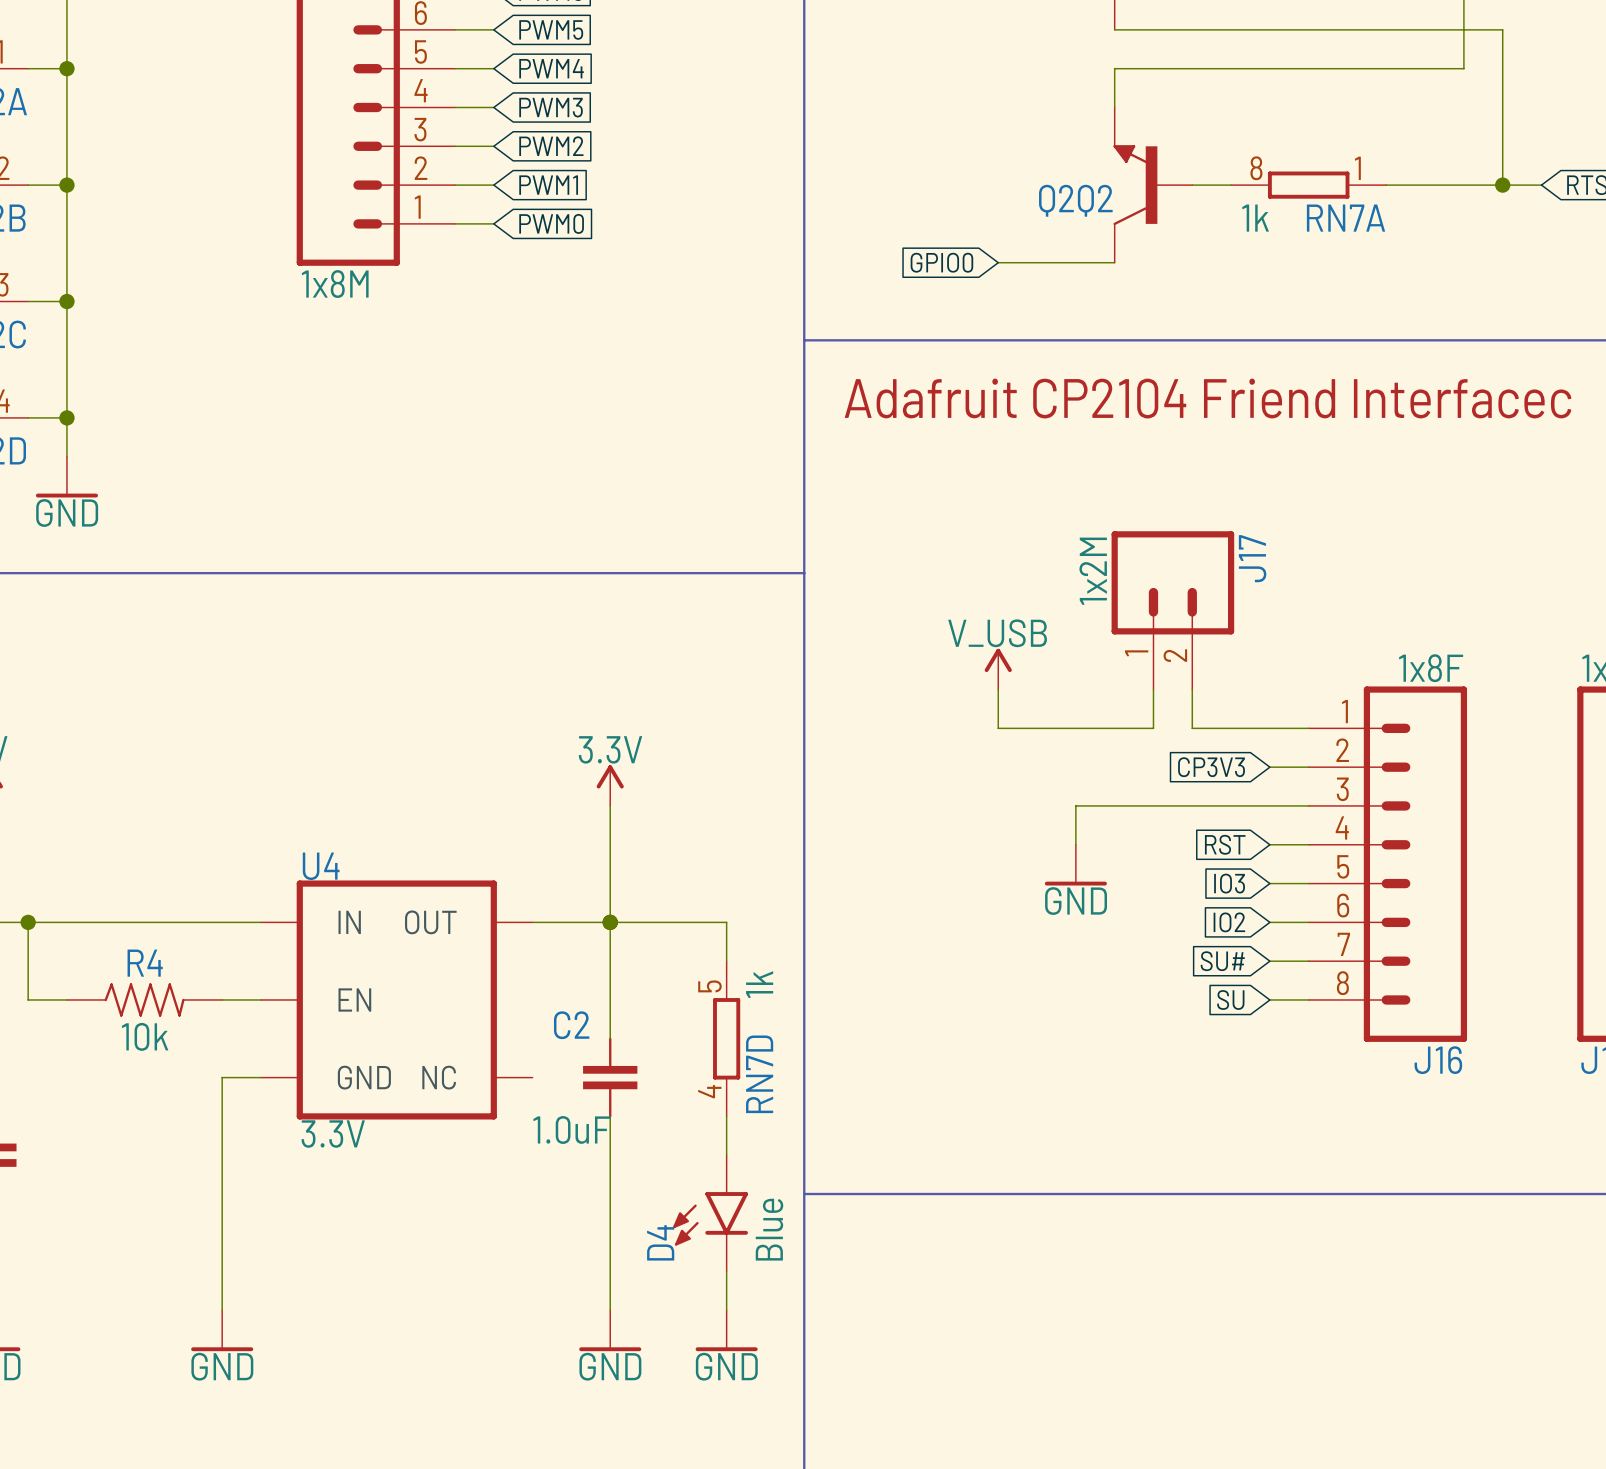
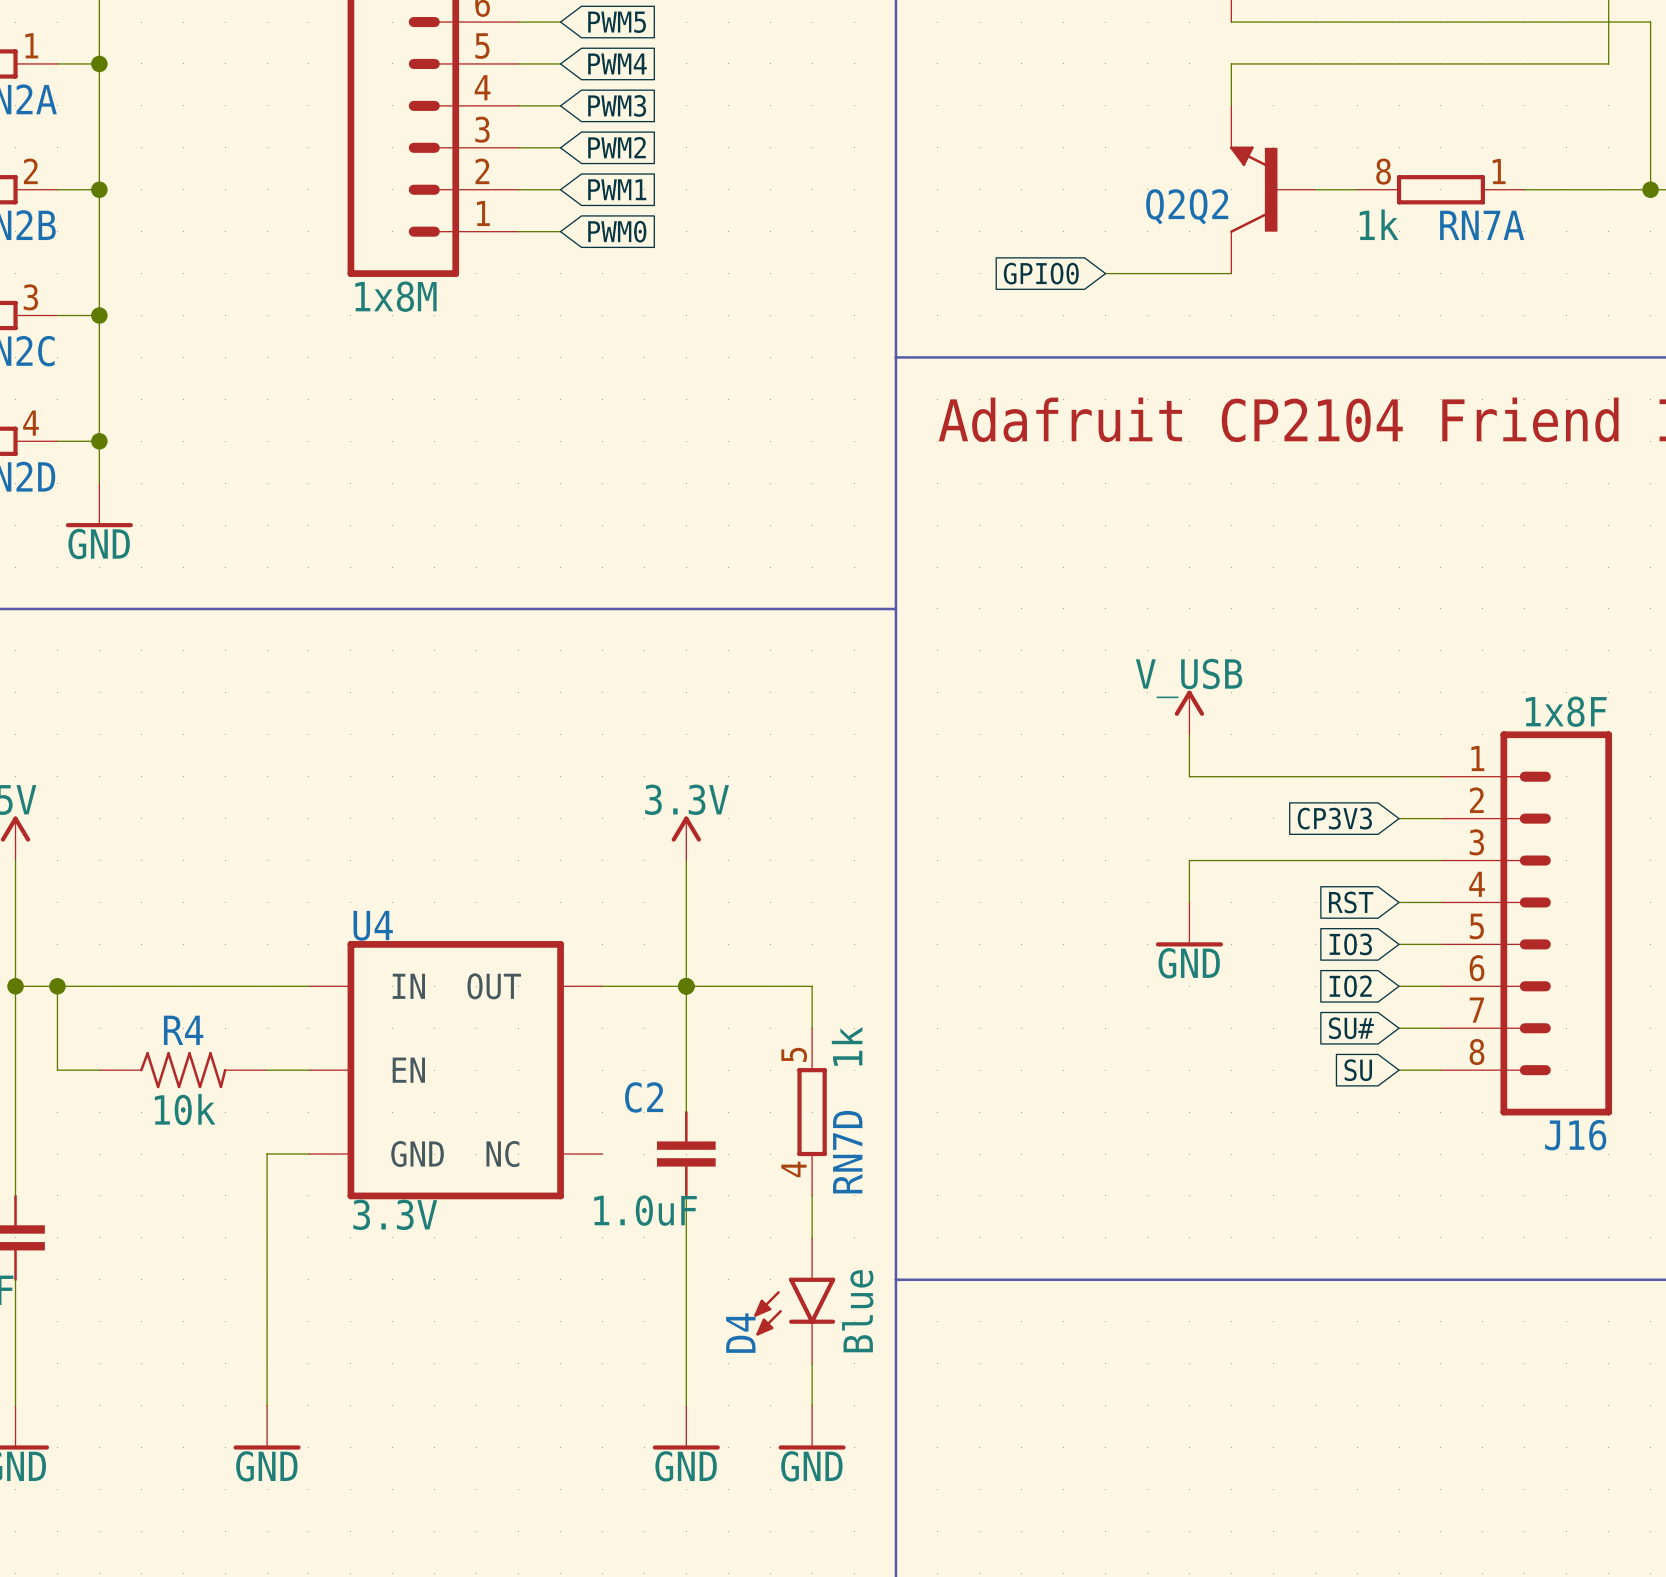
J17: 1x2M (1172, 610) -> none
power symbol position: V_USB (998, 669) -> V_USB (1189, 712)
wire: (998, 689) (998, 728) (1075, 728) -> (1189, 734) (1189, 776)
wire: (1153, 689) (1153, 728) -> (1315, 776) (1273, 776)
wire: (1192, 689) (1192, 728) -> none

